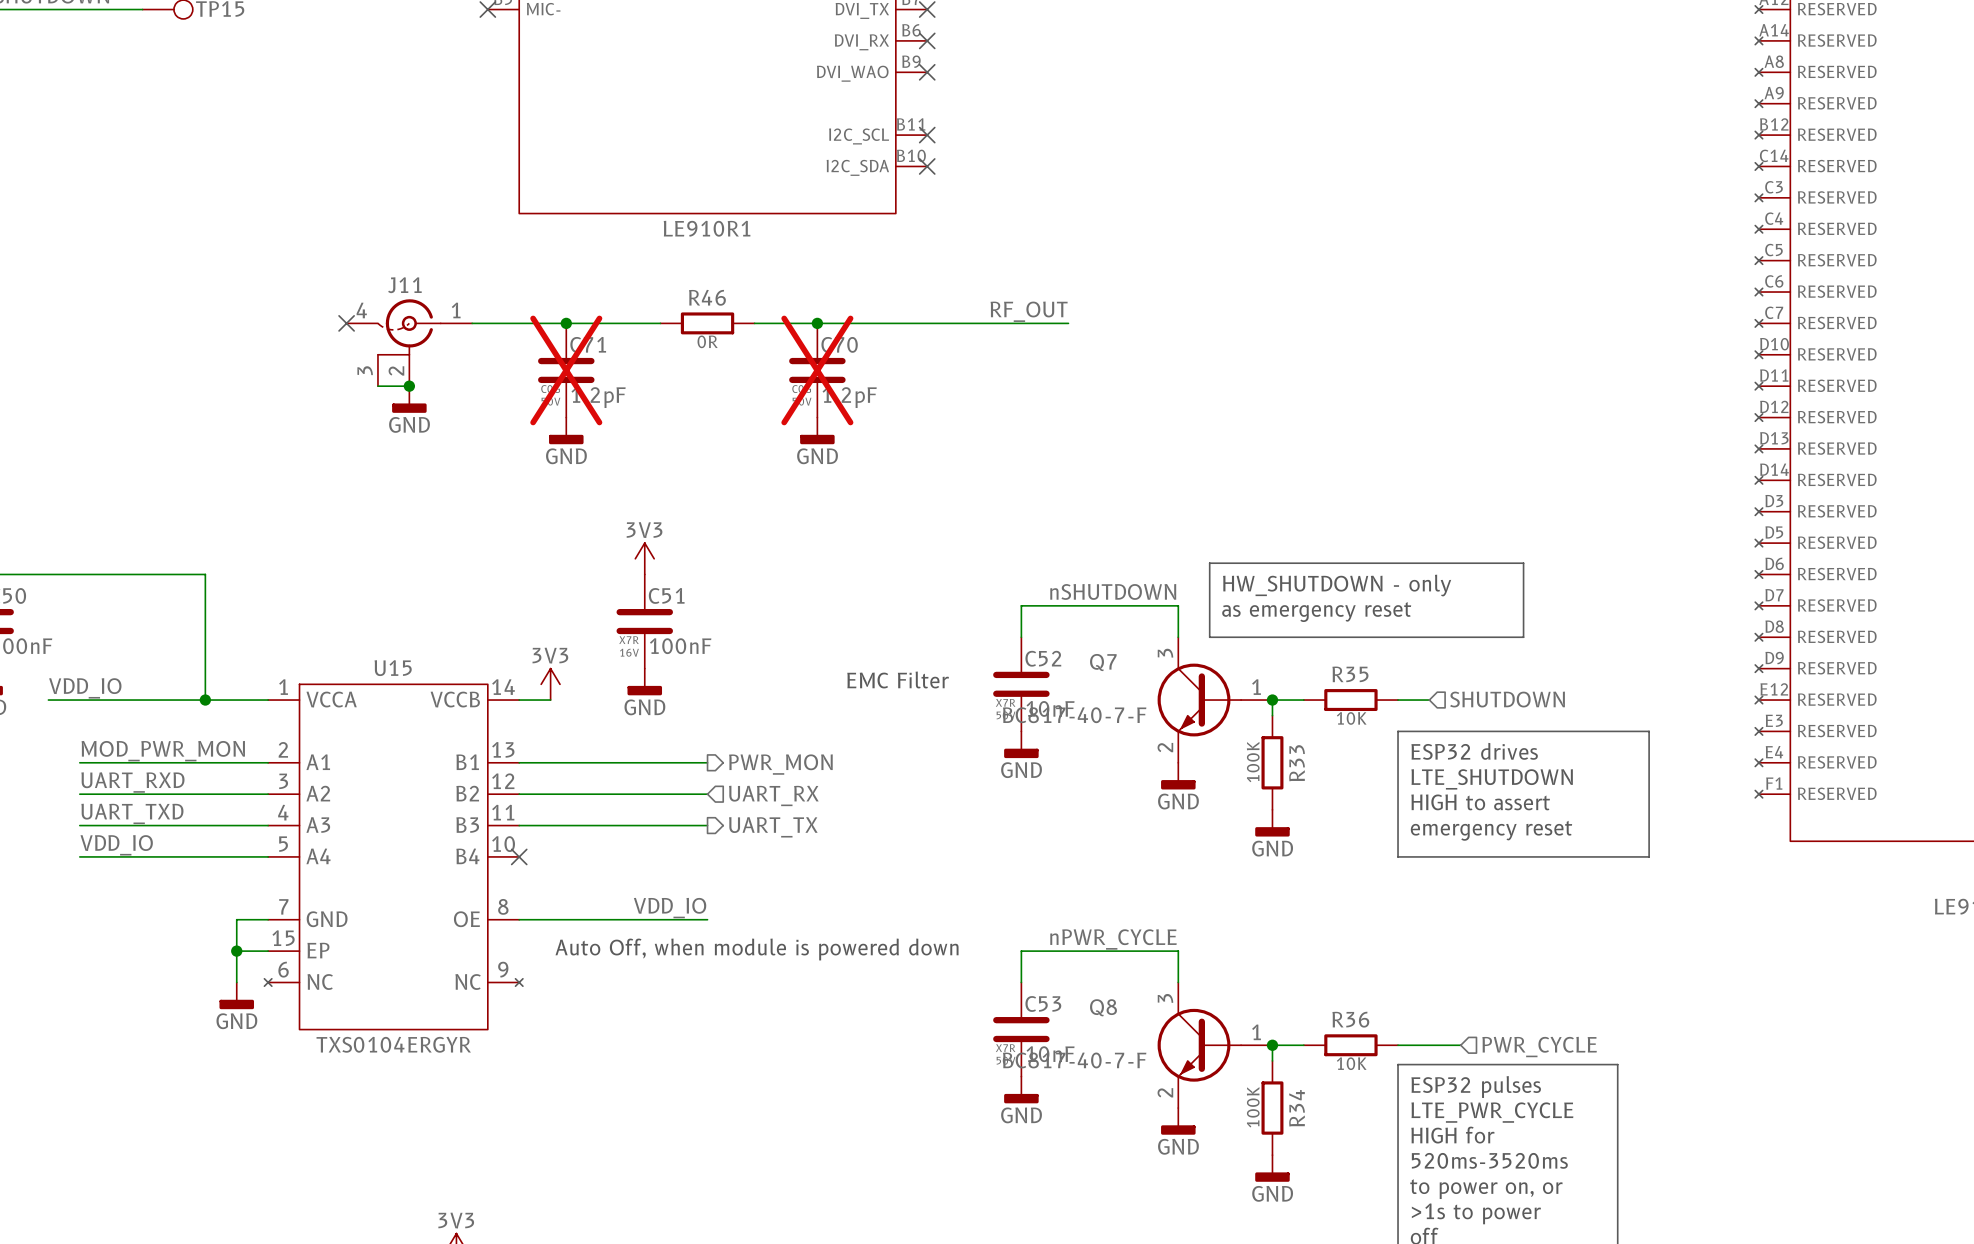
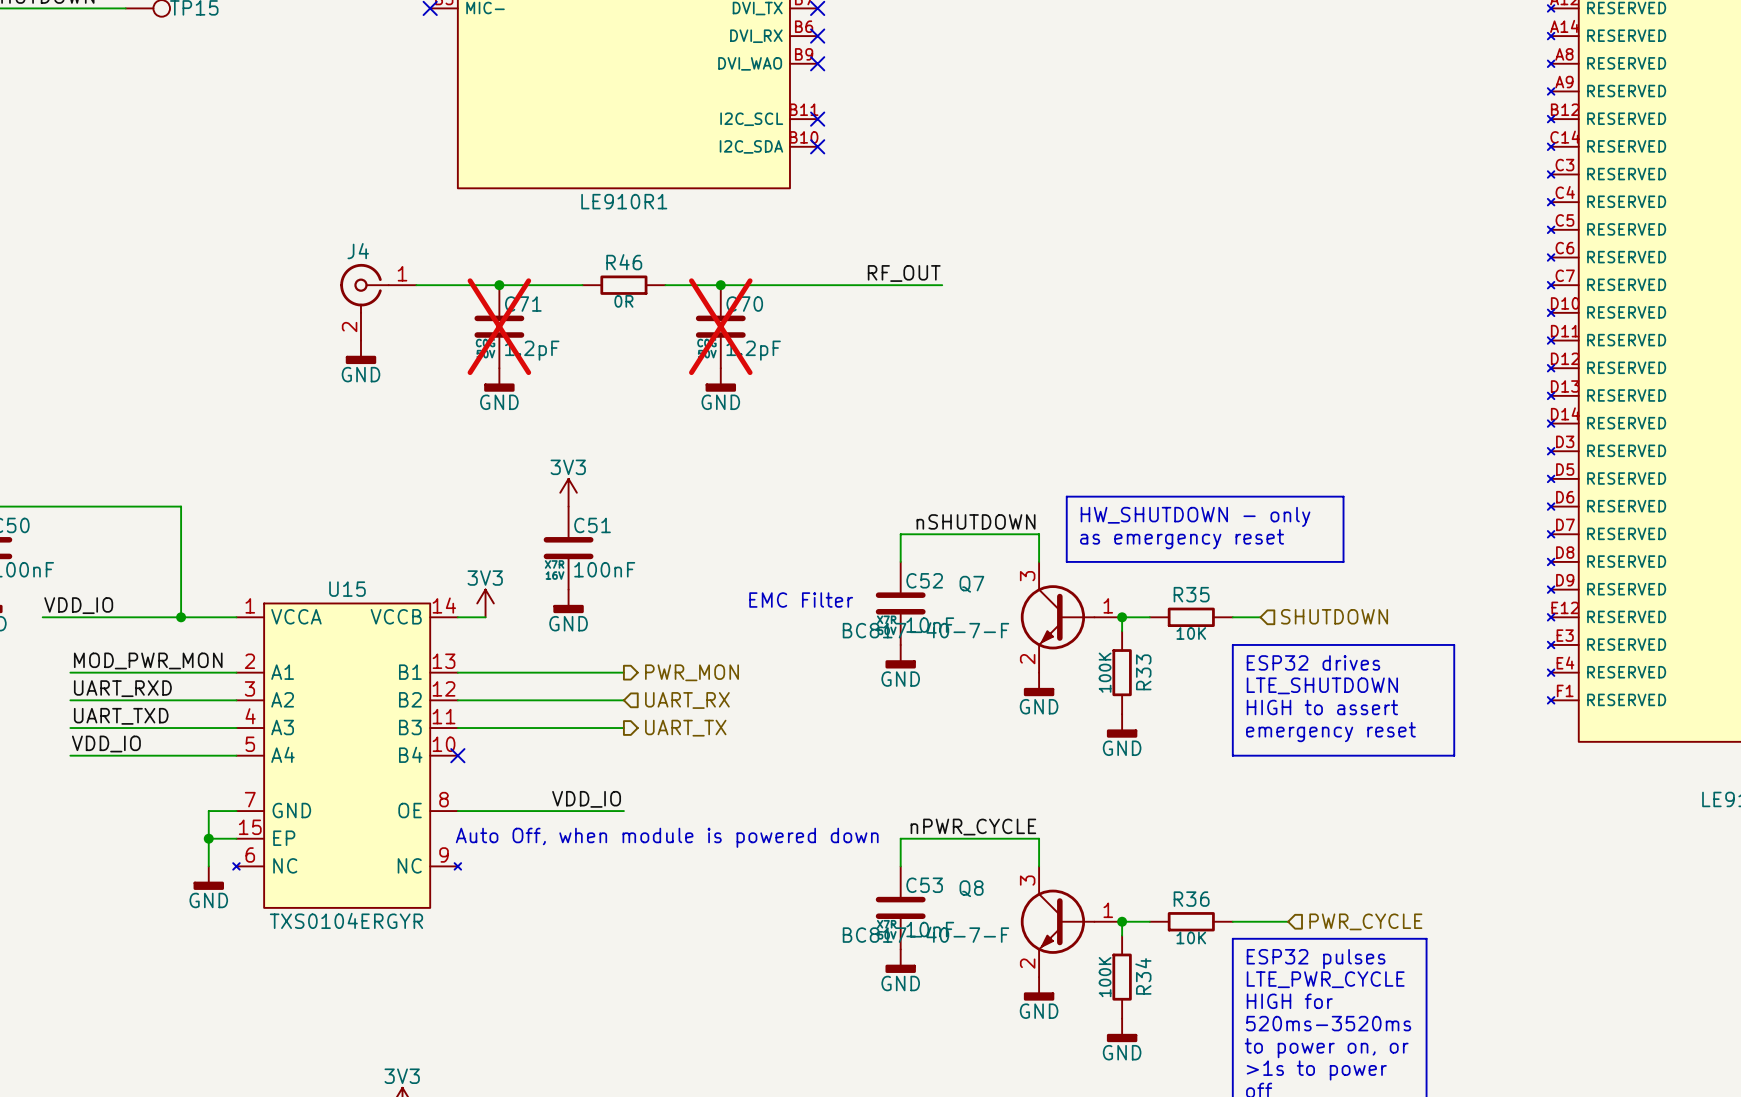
no-connect mark: (346, 323) -> none
J11: (409, 342) -> none
J4: none -> (378, 302)
wire: (377, 386) (409, 386) -> none
junction: (409, 386) -> none

